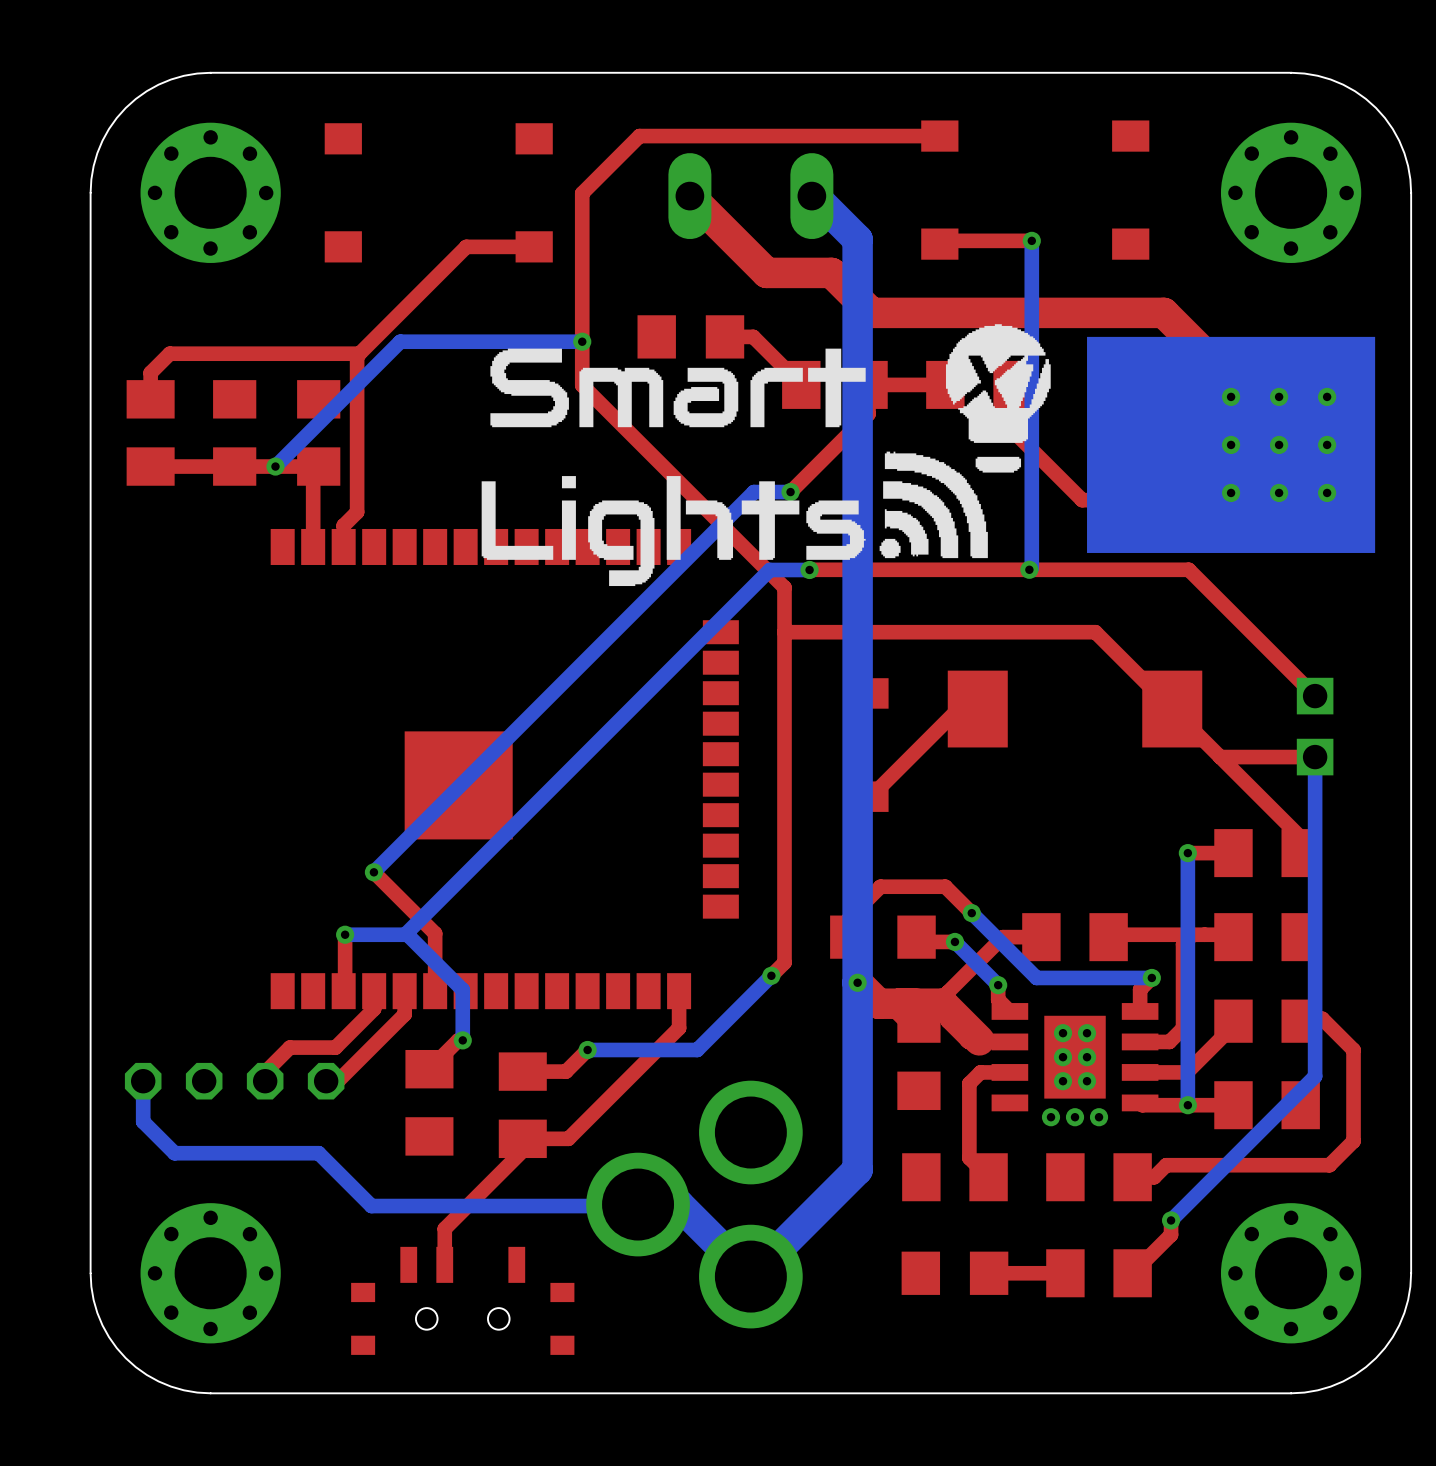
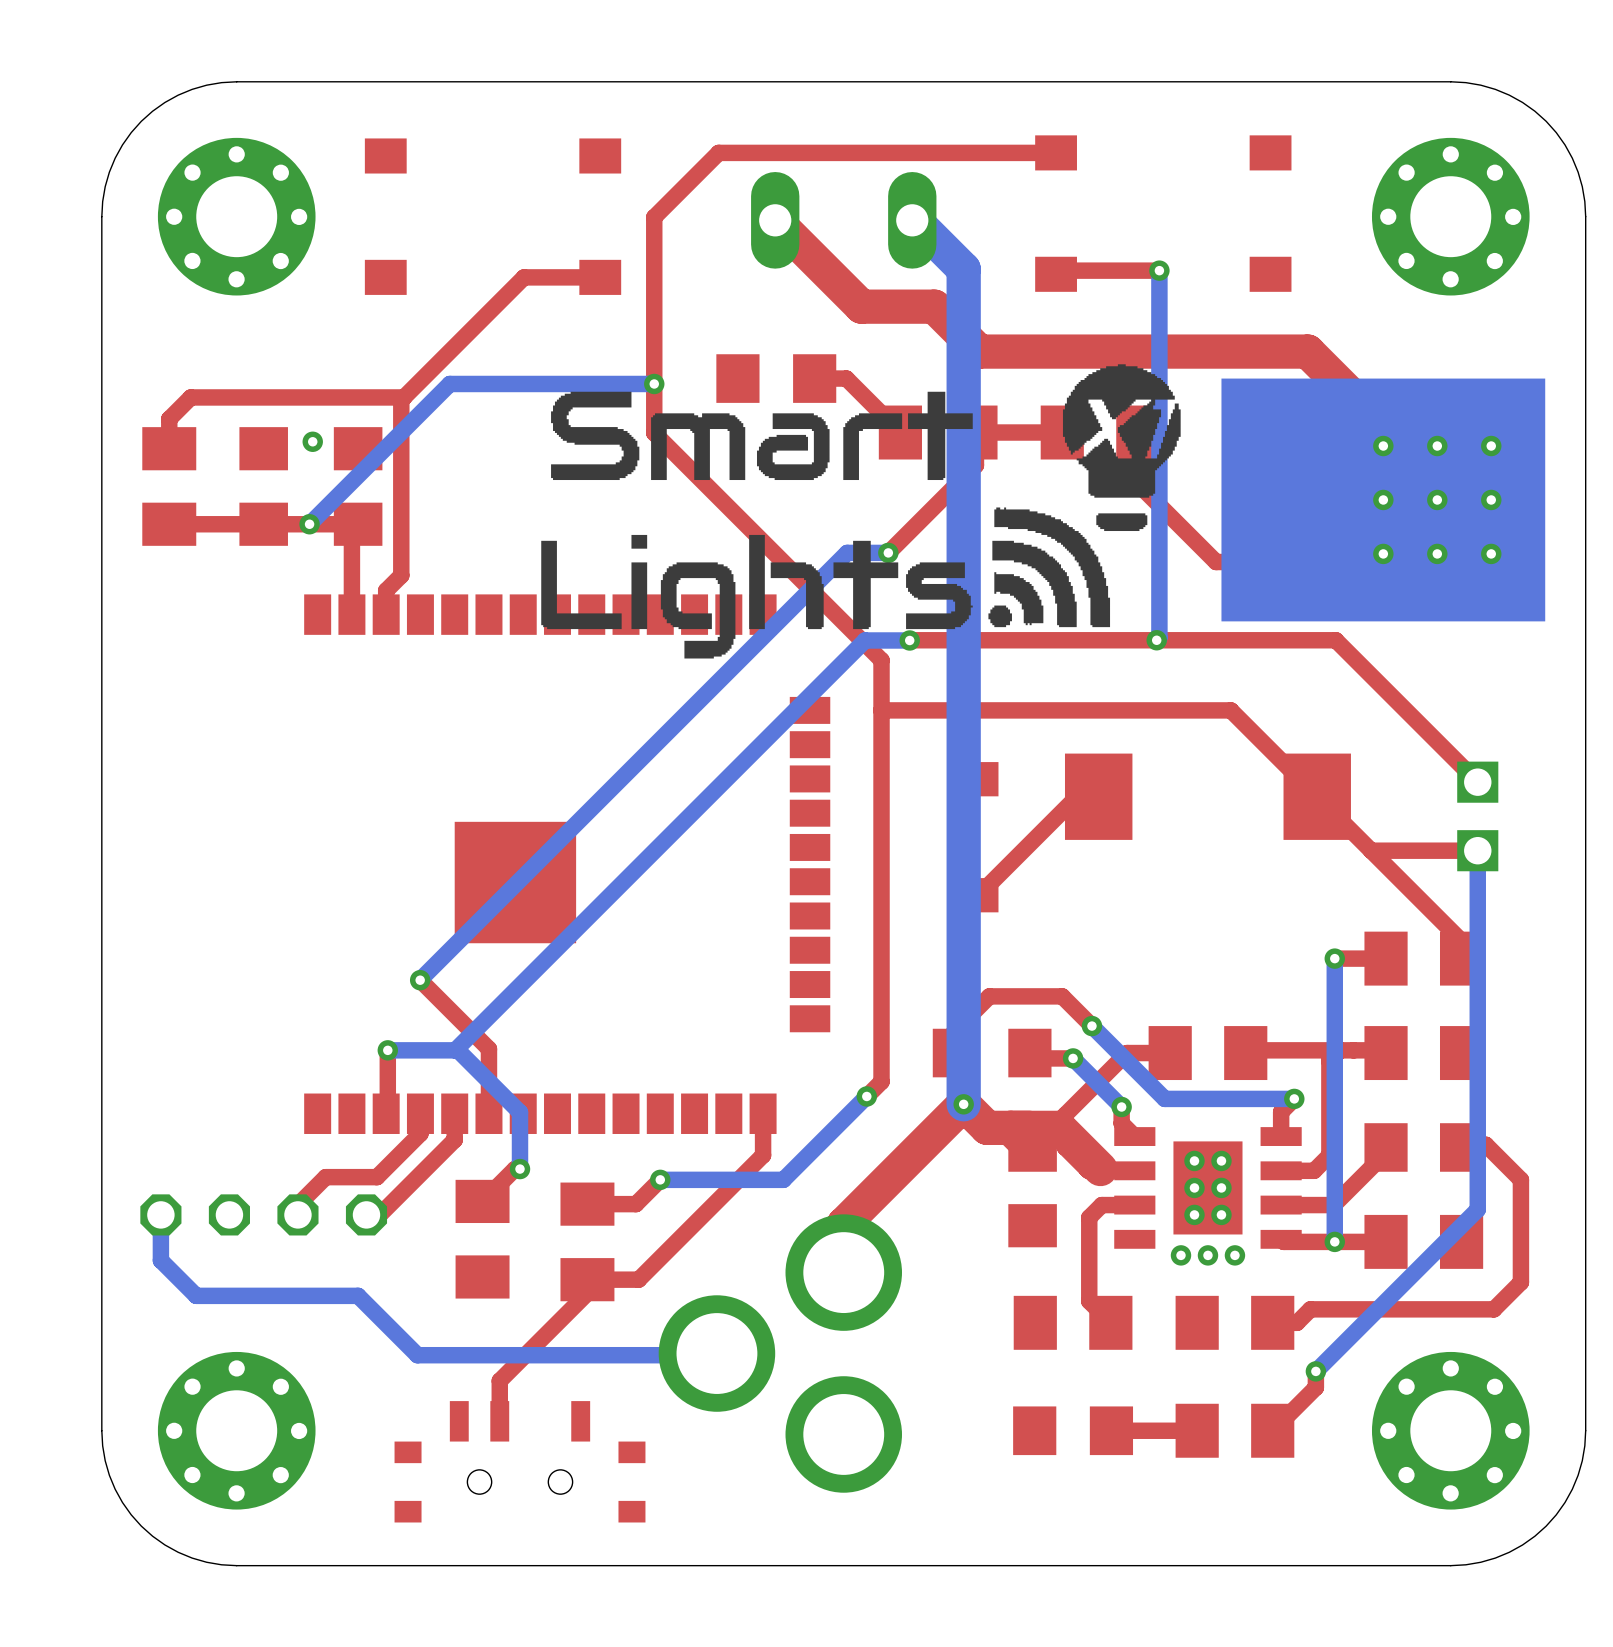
via: none -> (312, 441)
top track: none -> (963, 1104) (843, 1224) (843, 1272)
bottom track: (857, 982) (857, 1169) (750, 1276) (678, 1204) (636, 1206) -> none

